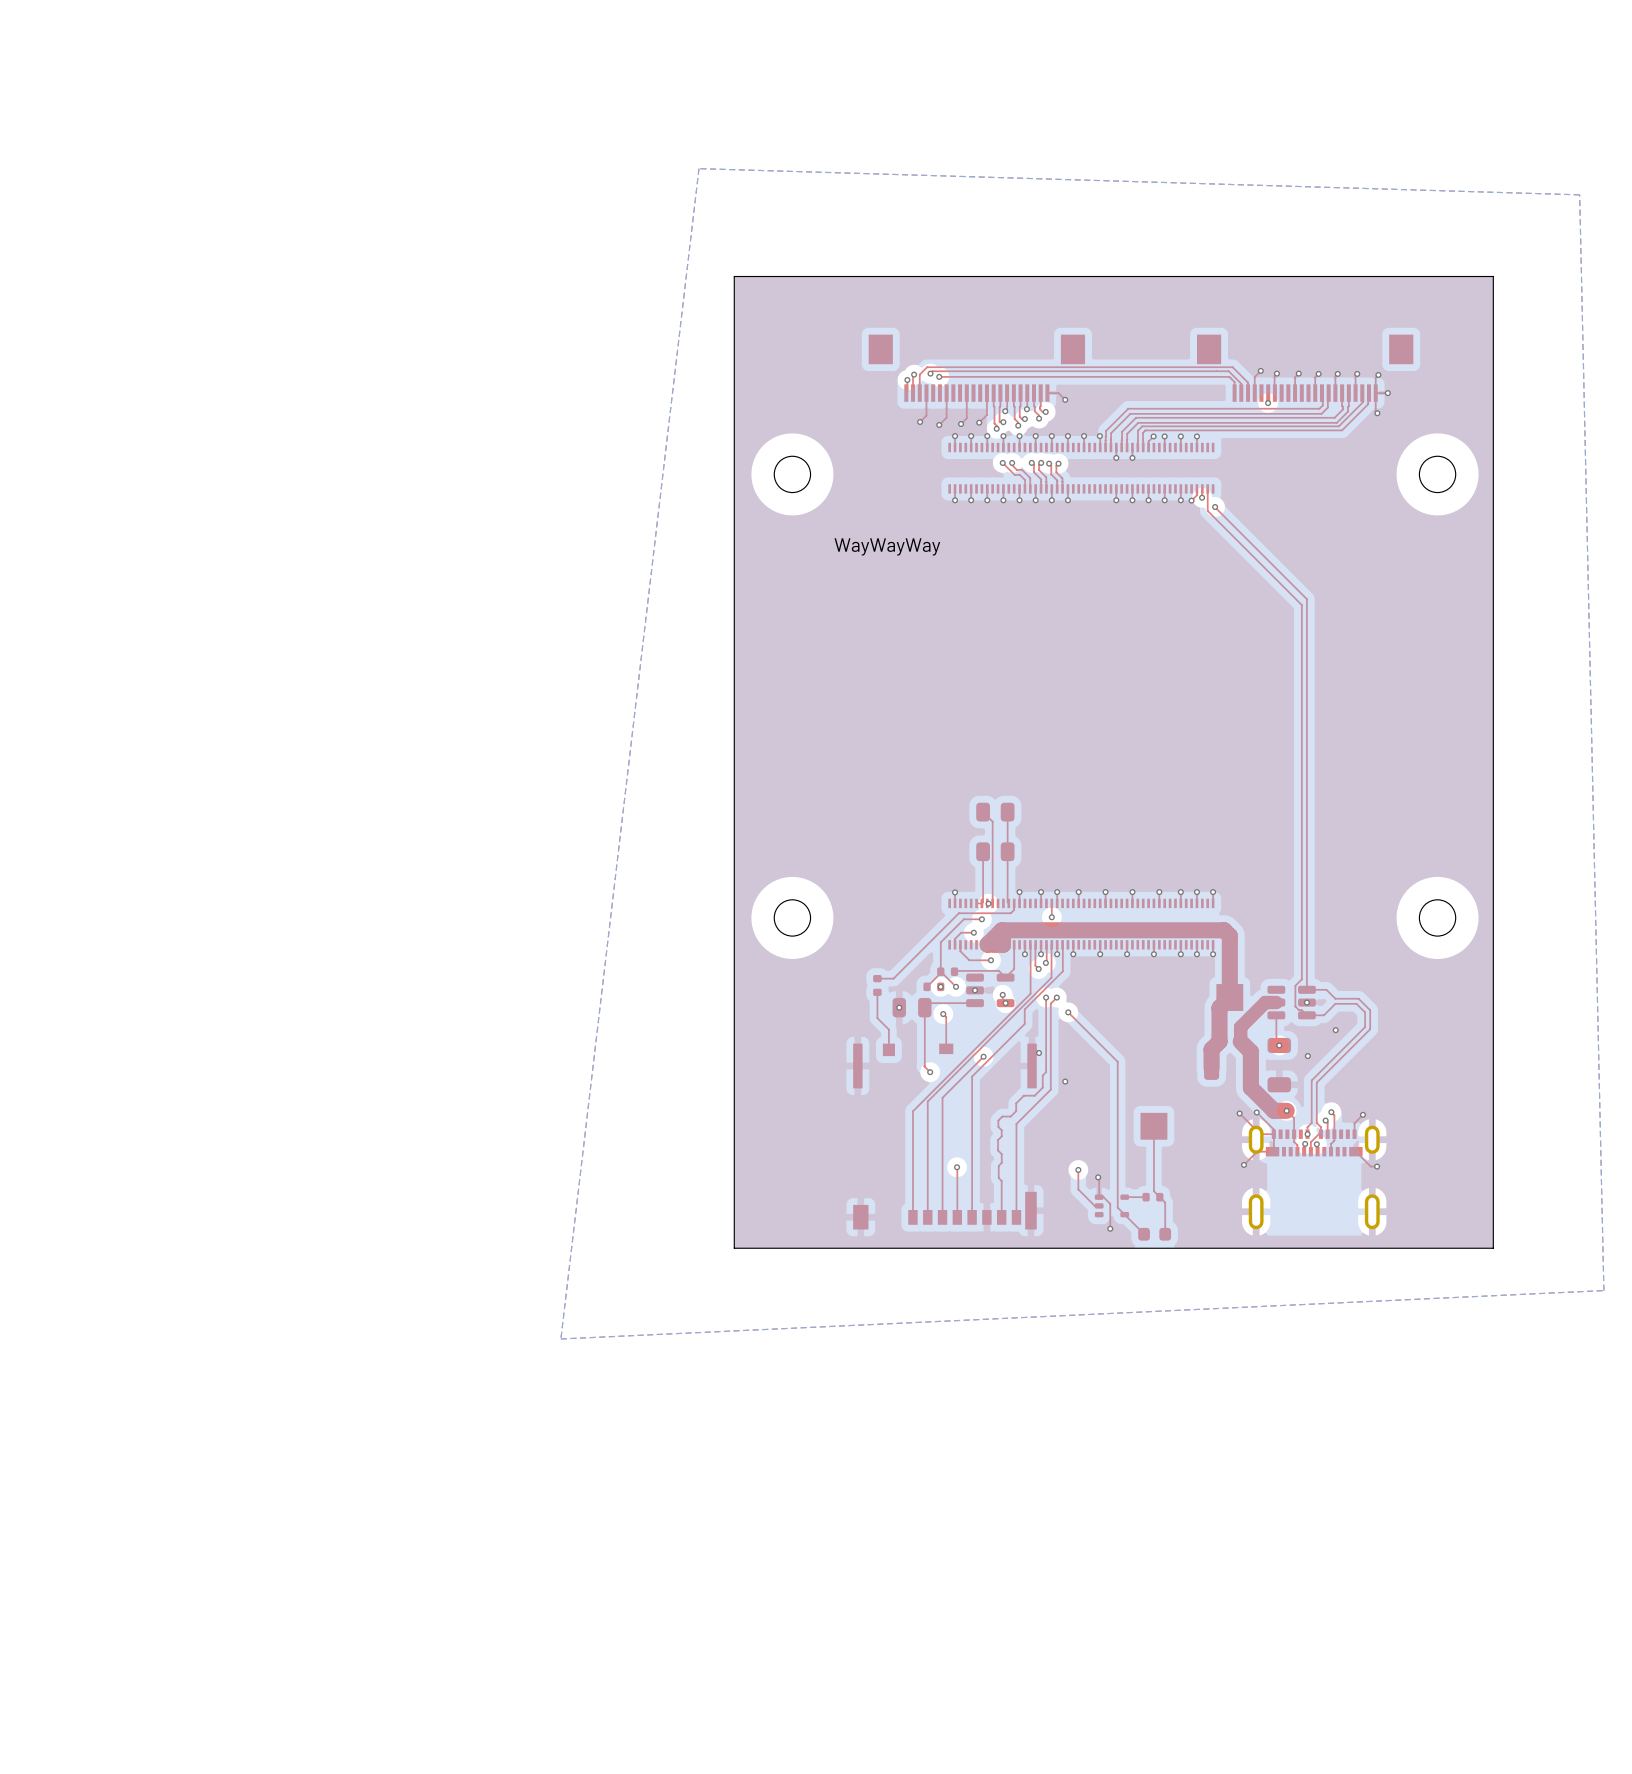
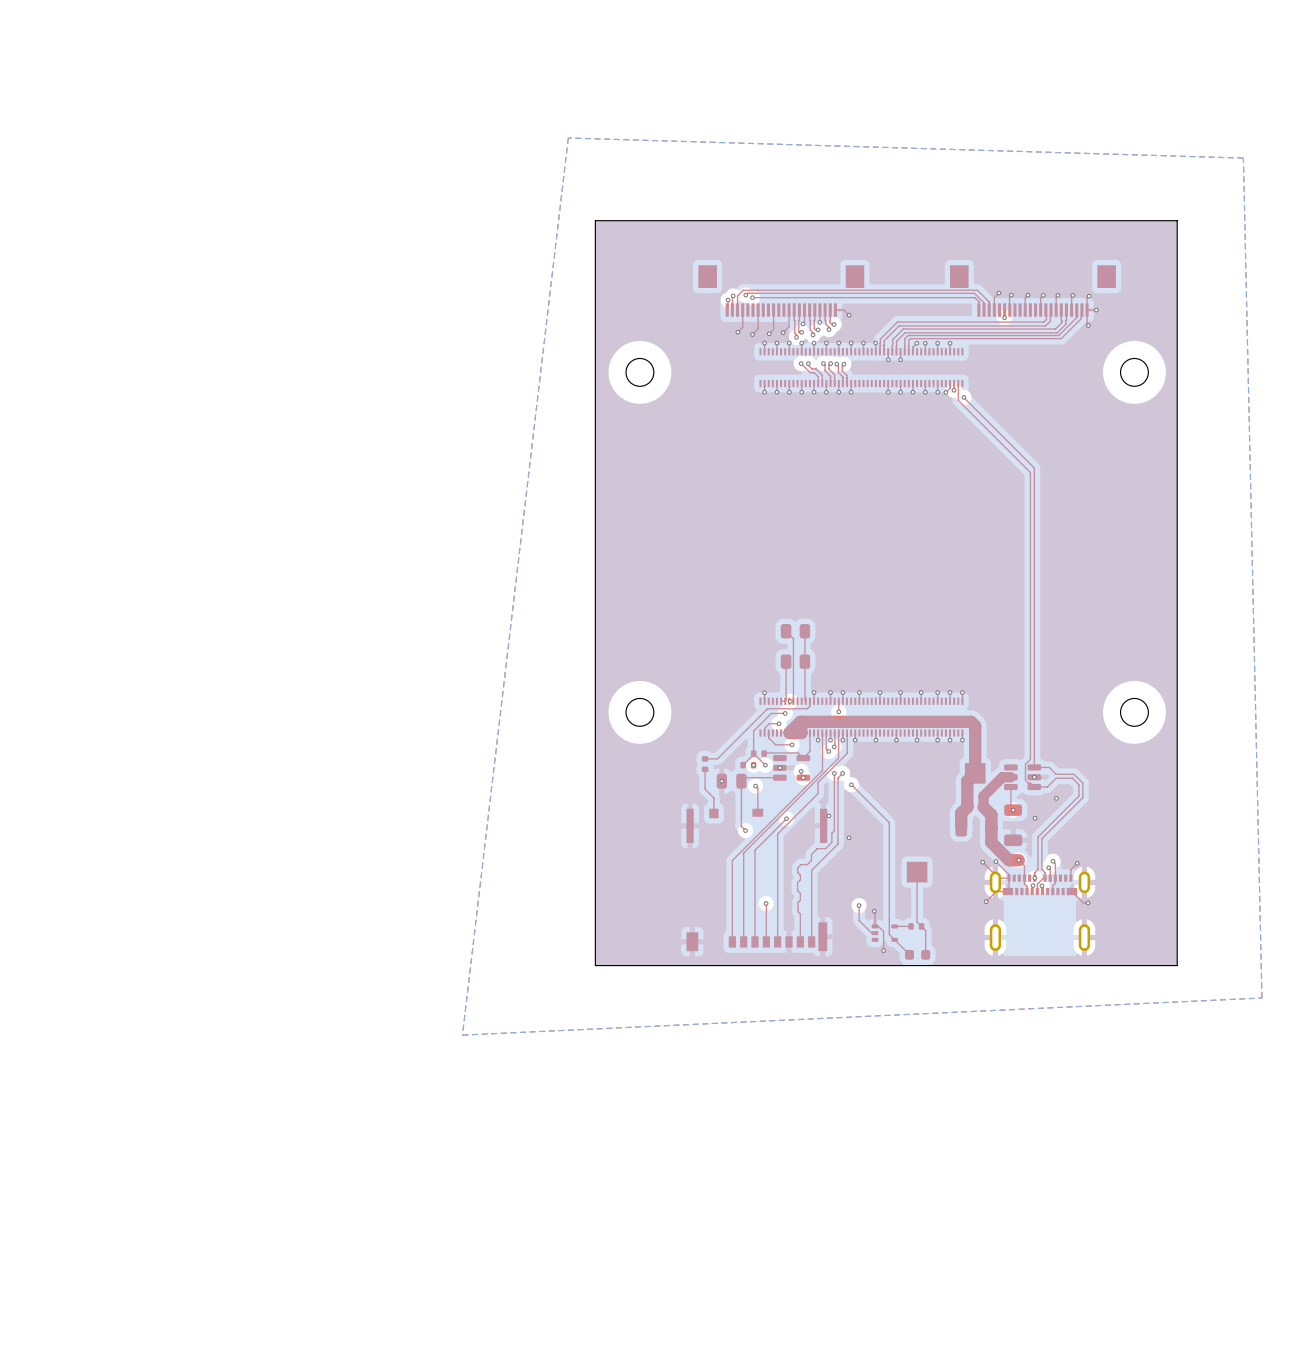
text: WayWayWay (887, 546) -> none

